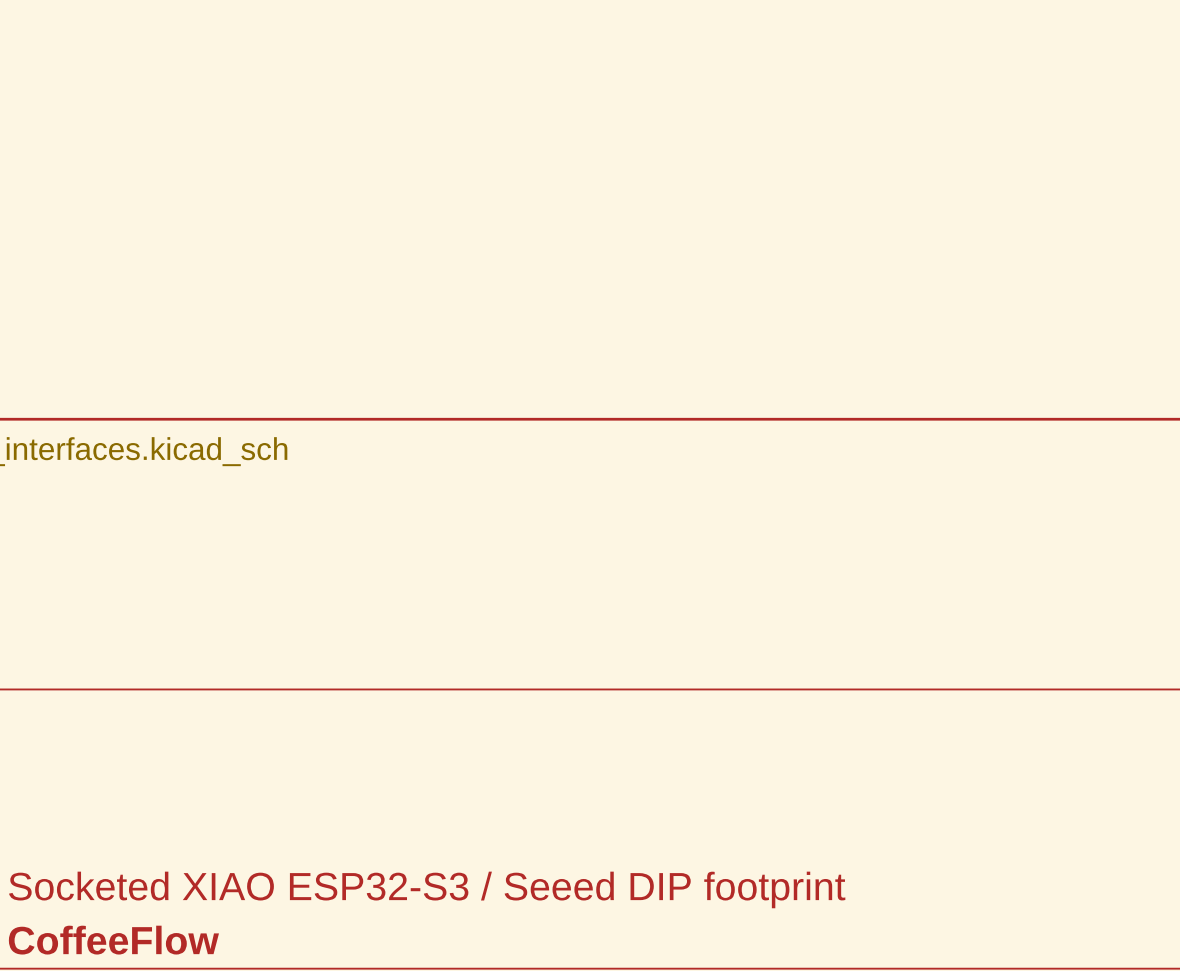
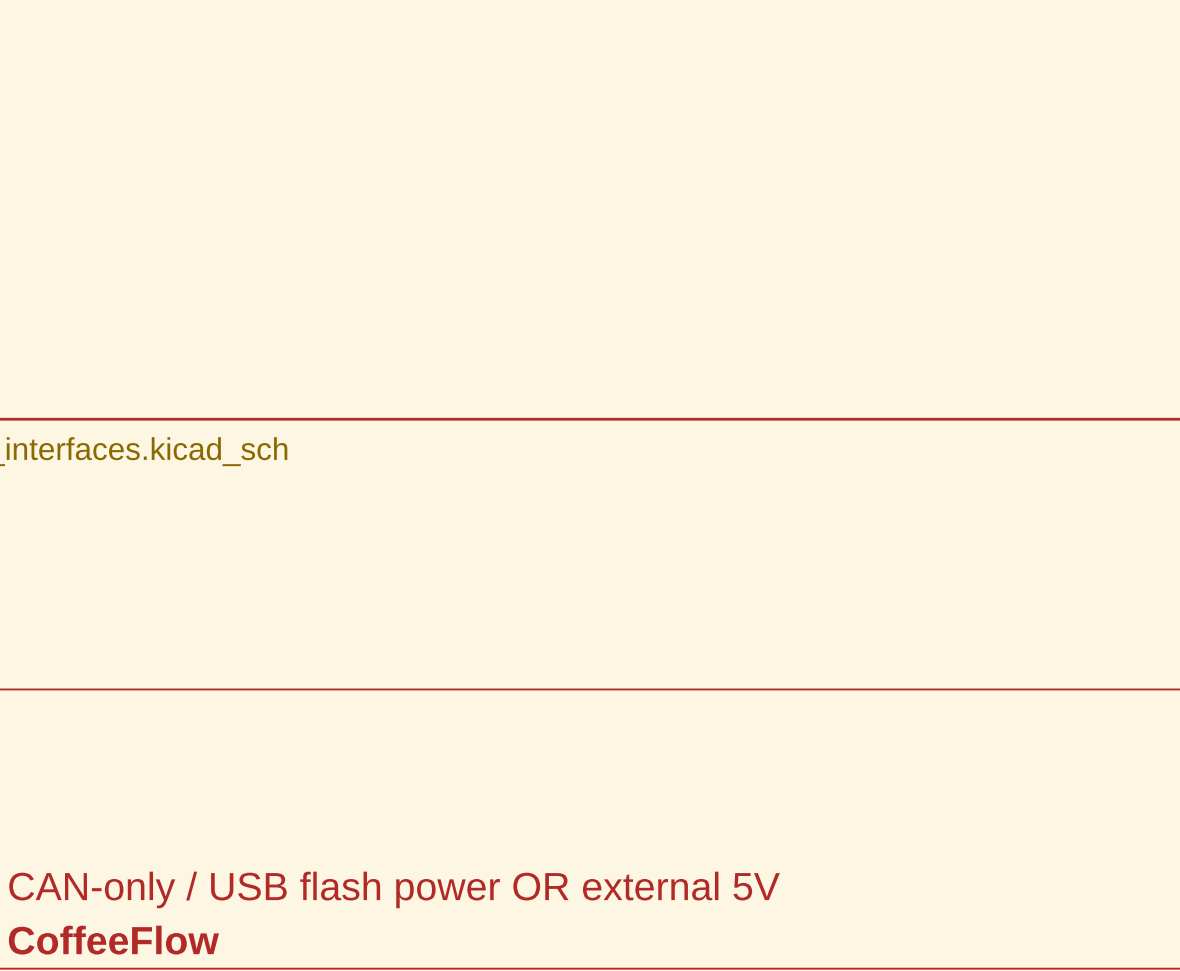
title block: Socketed XIAO ESP32-S3 / Seeed DIP footprint (427, 889) -> CAN-only / USB flash power OR external 5V (394, 889)

